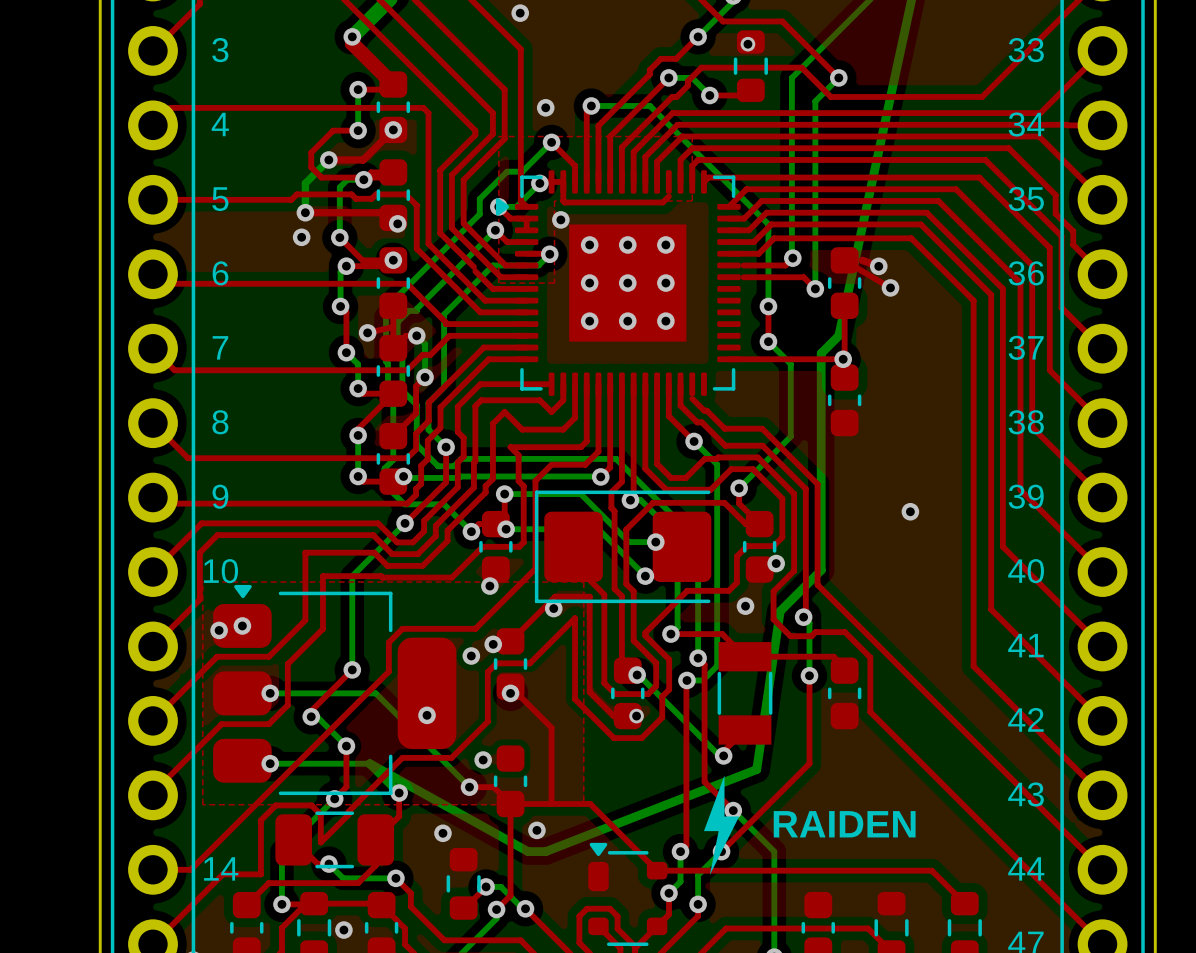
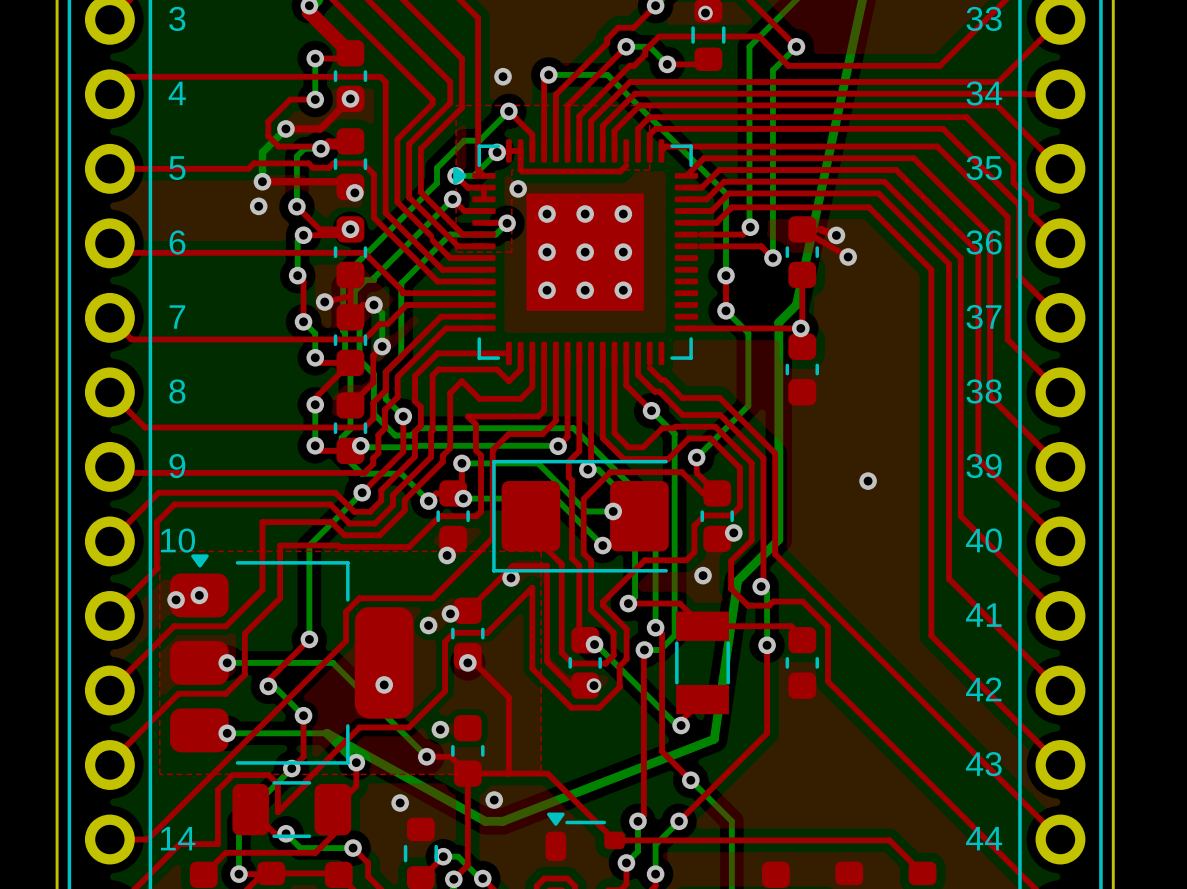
drawing: [703, 775, 740, 876] -> none
text: RAIDEN (844, 824) -> none

